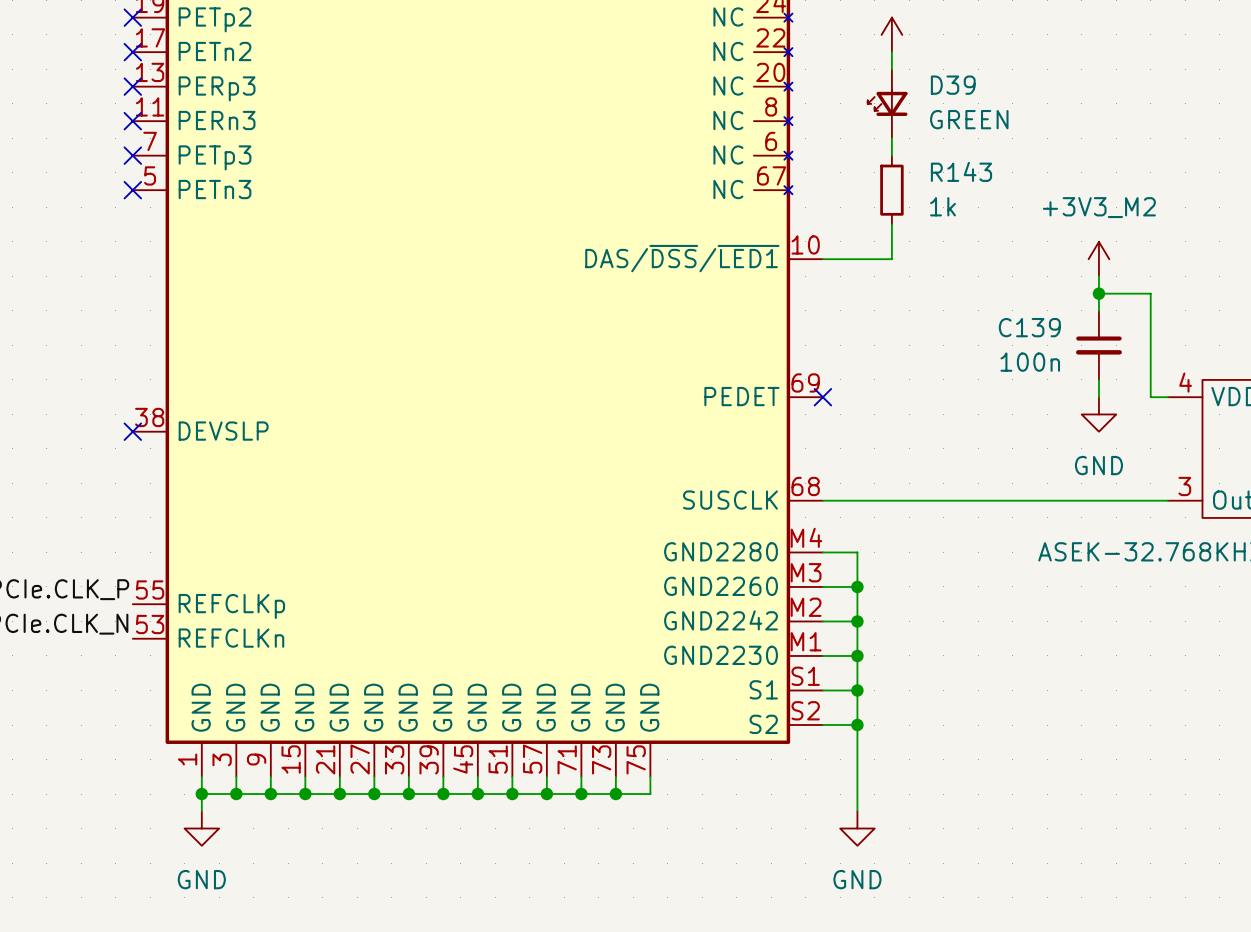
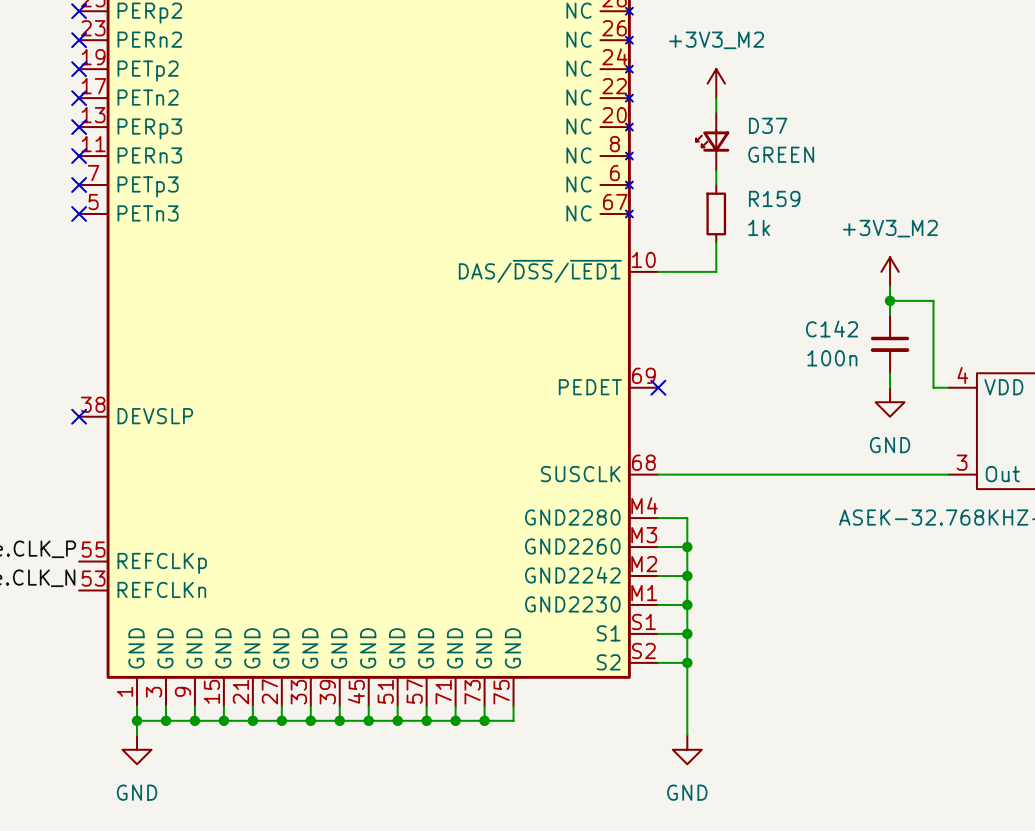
D39 name: D39 (953, 85) -> D37 (768, 125)
R143 name: R143 (961, 171) -> R159 (774, 198)
C139 name: C139 (1029, 327) -> C142 (832, 329)

